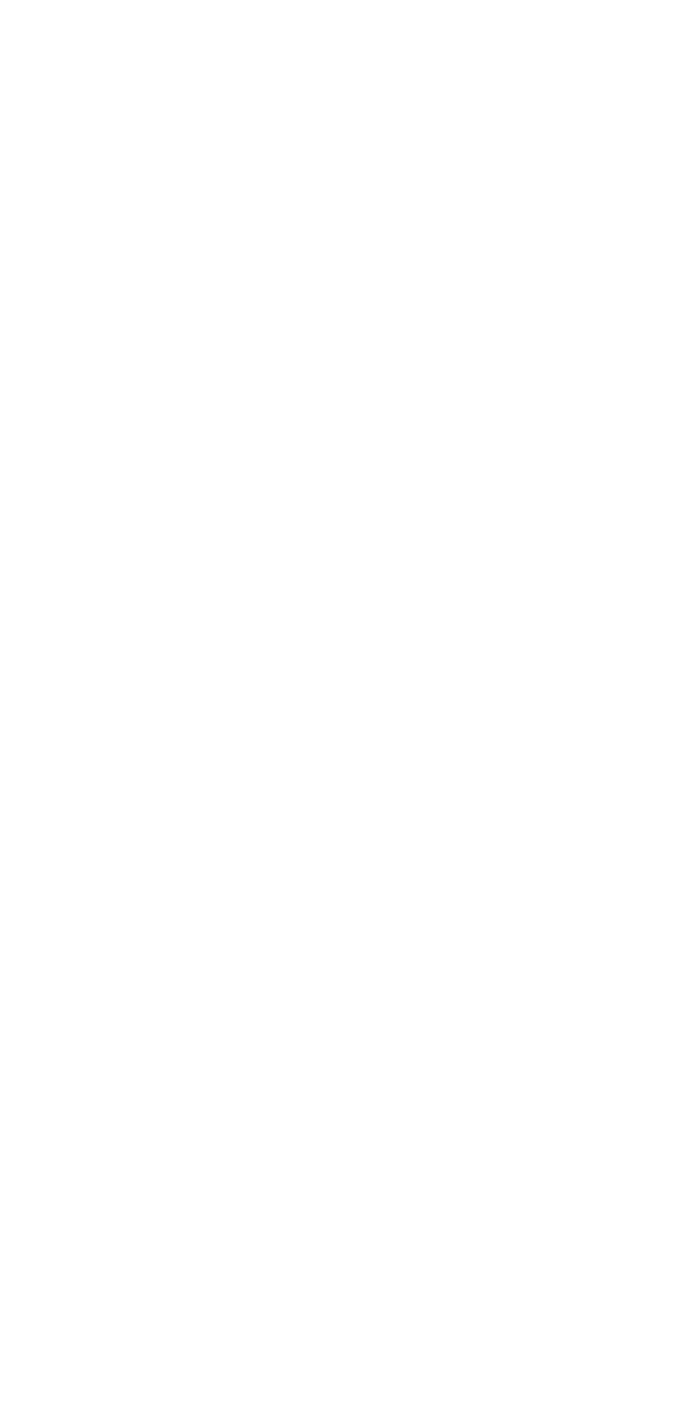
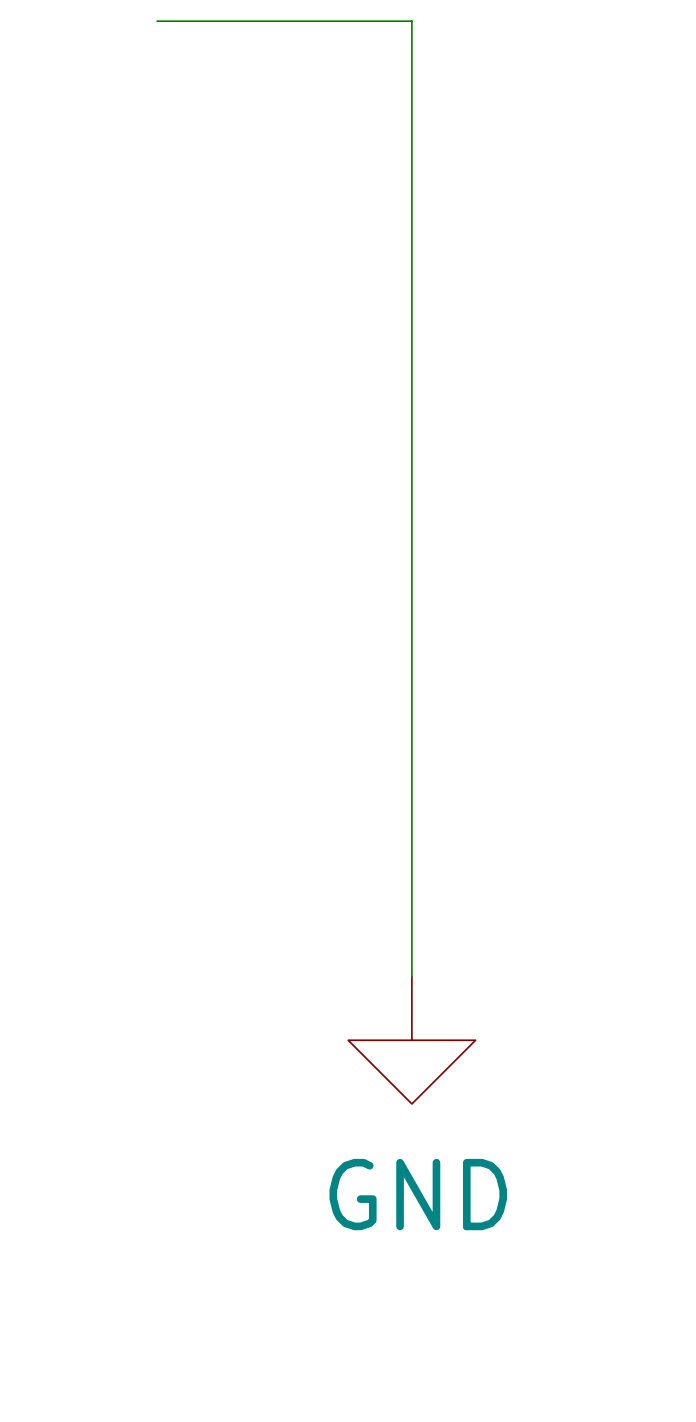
wire: none -> (157, 21) (411, 21) (411, 976)
power symbol: none -> GND (411, 1040)

